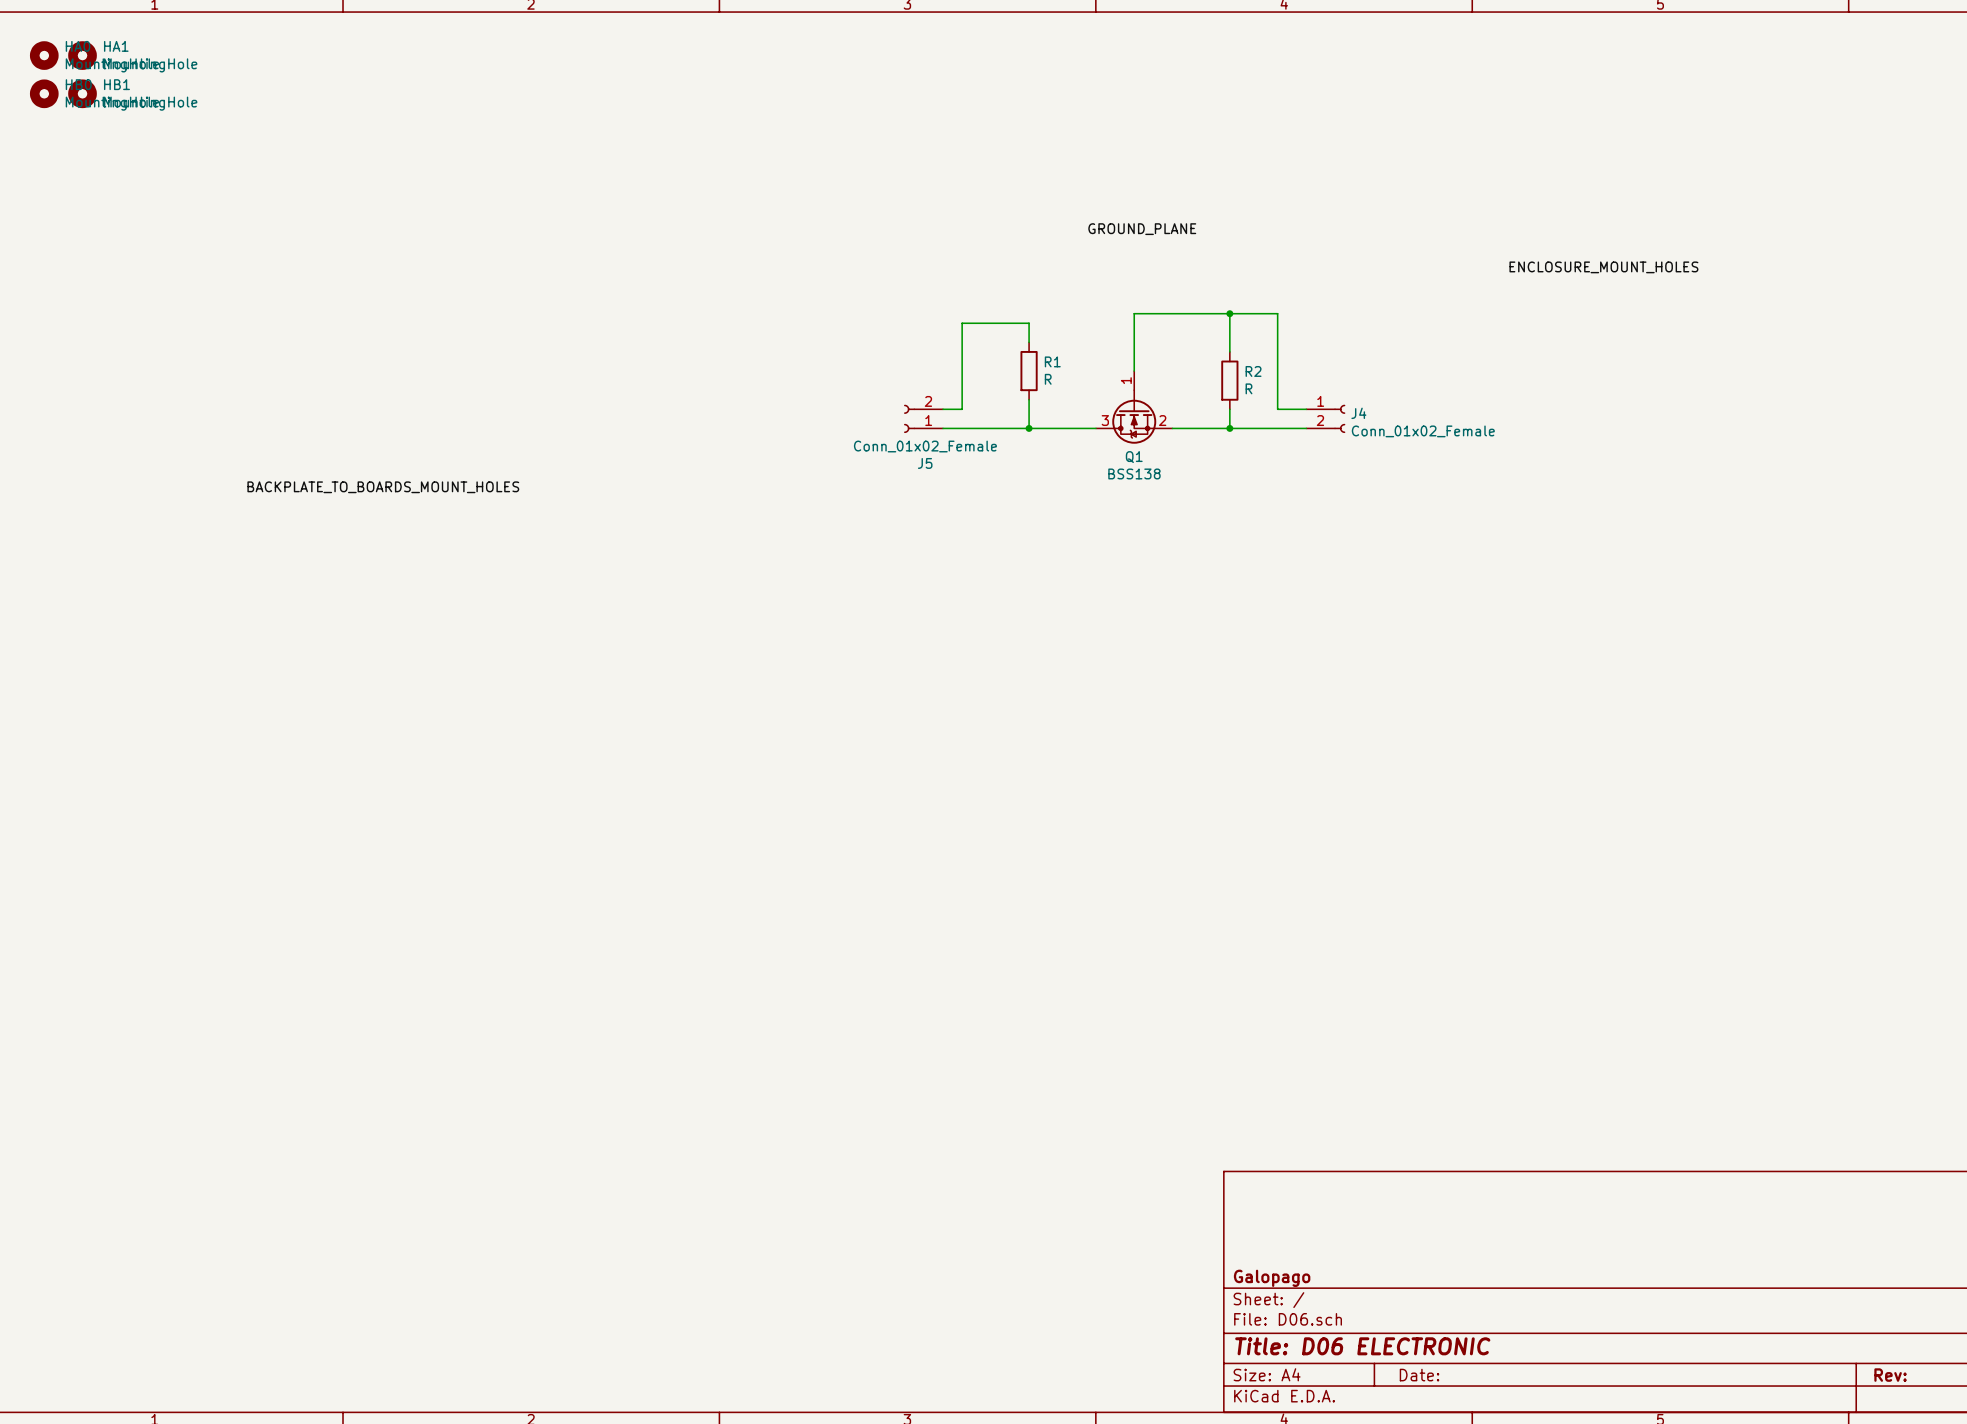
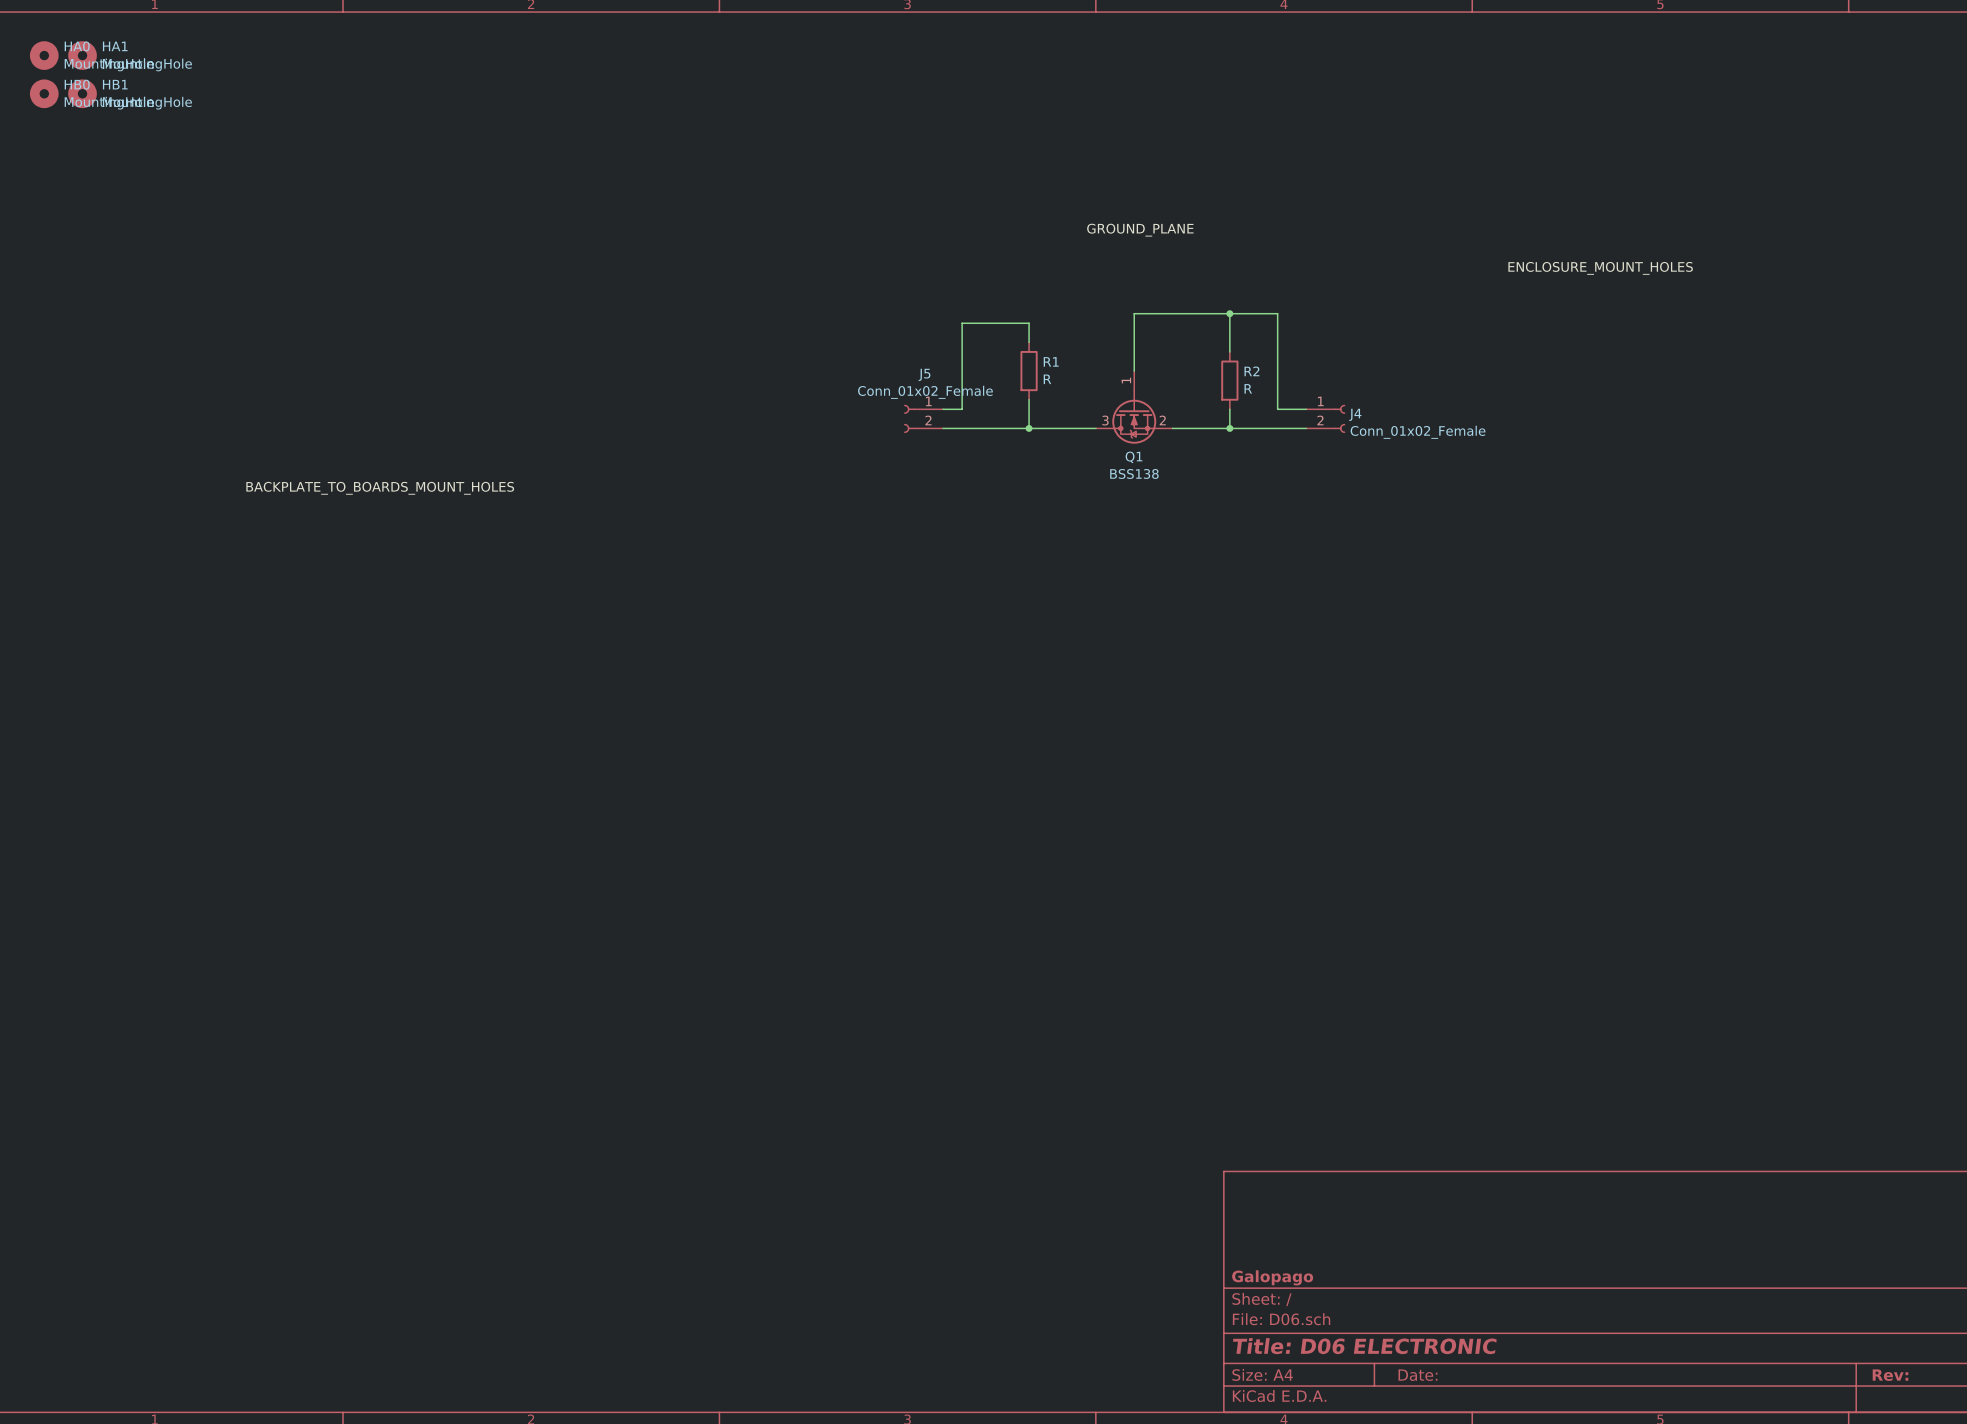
J5 flip: as is (909, 418) -> up-down (909, 418)

